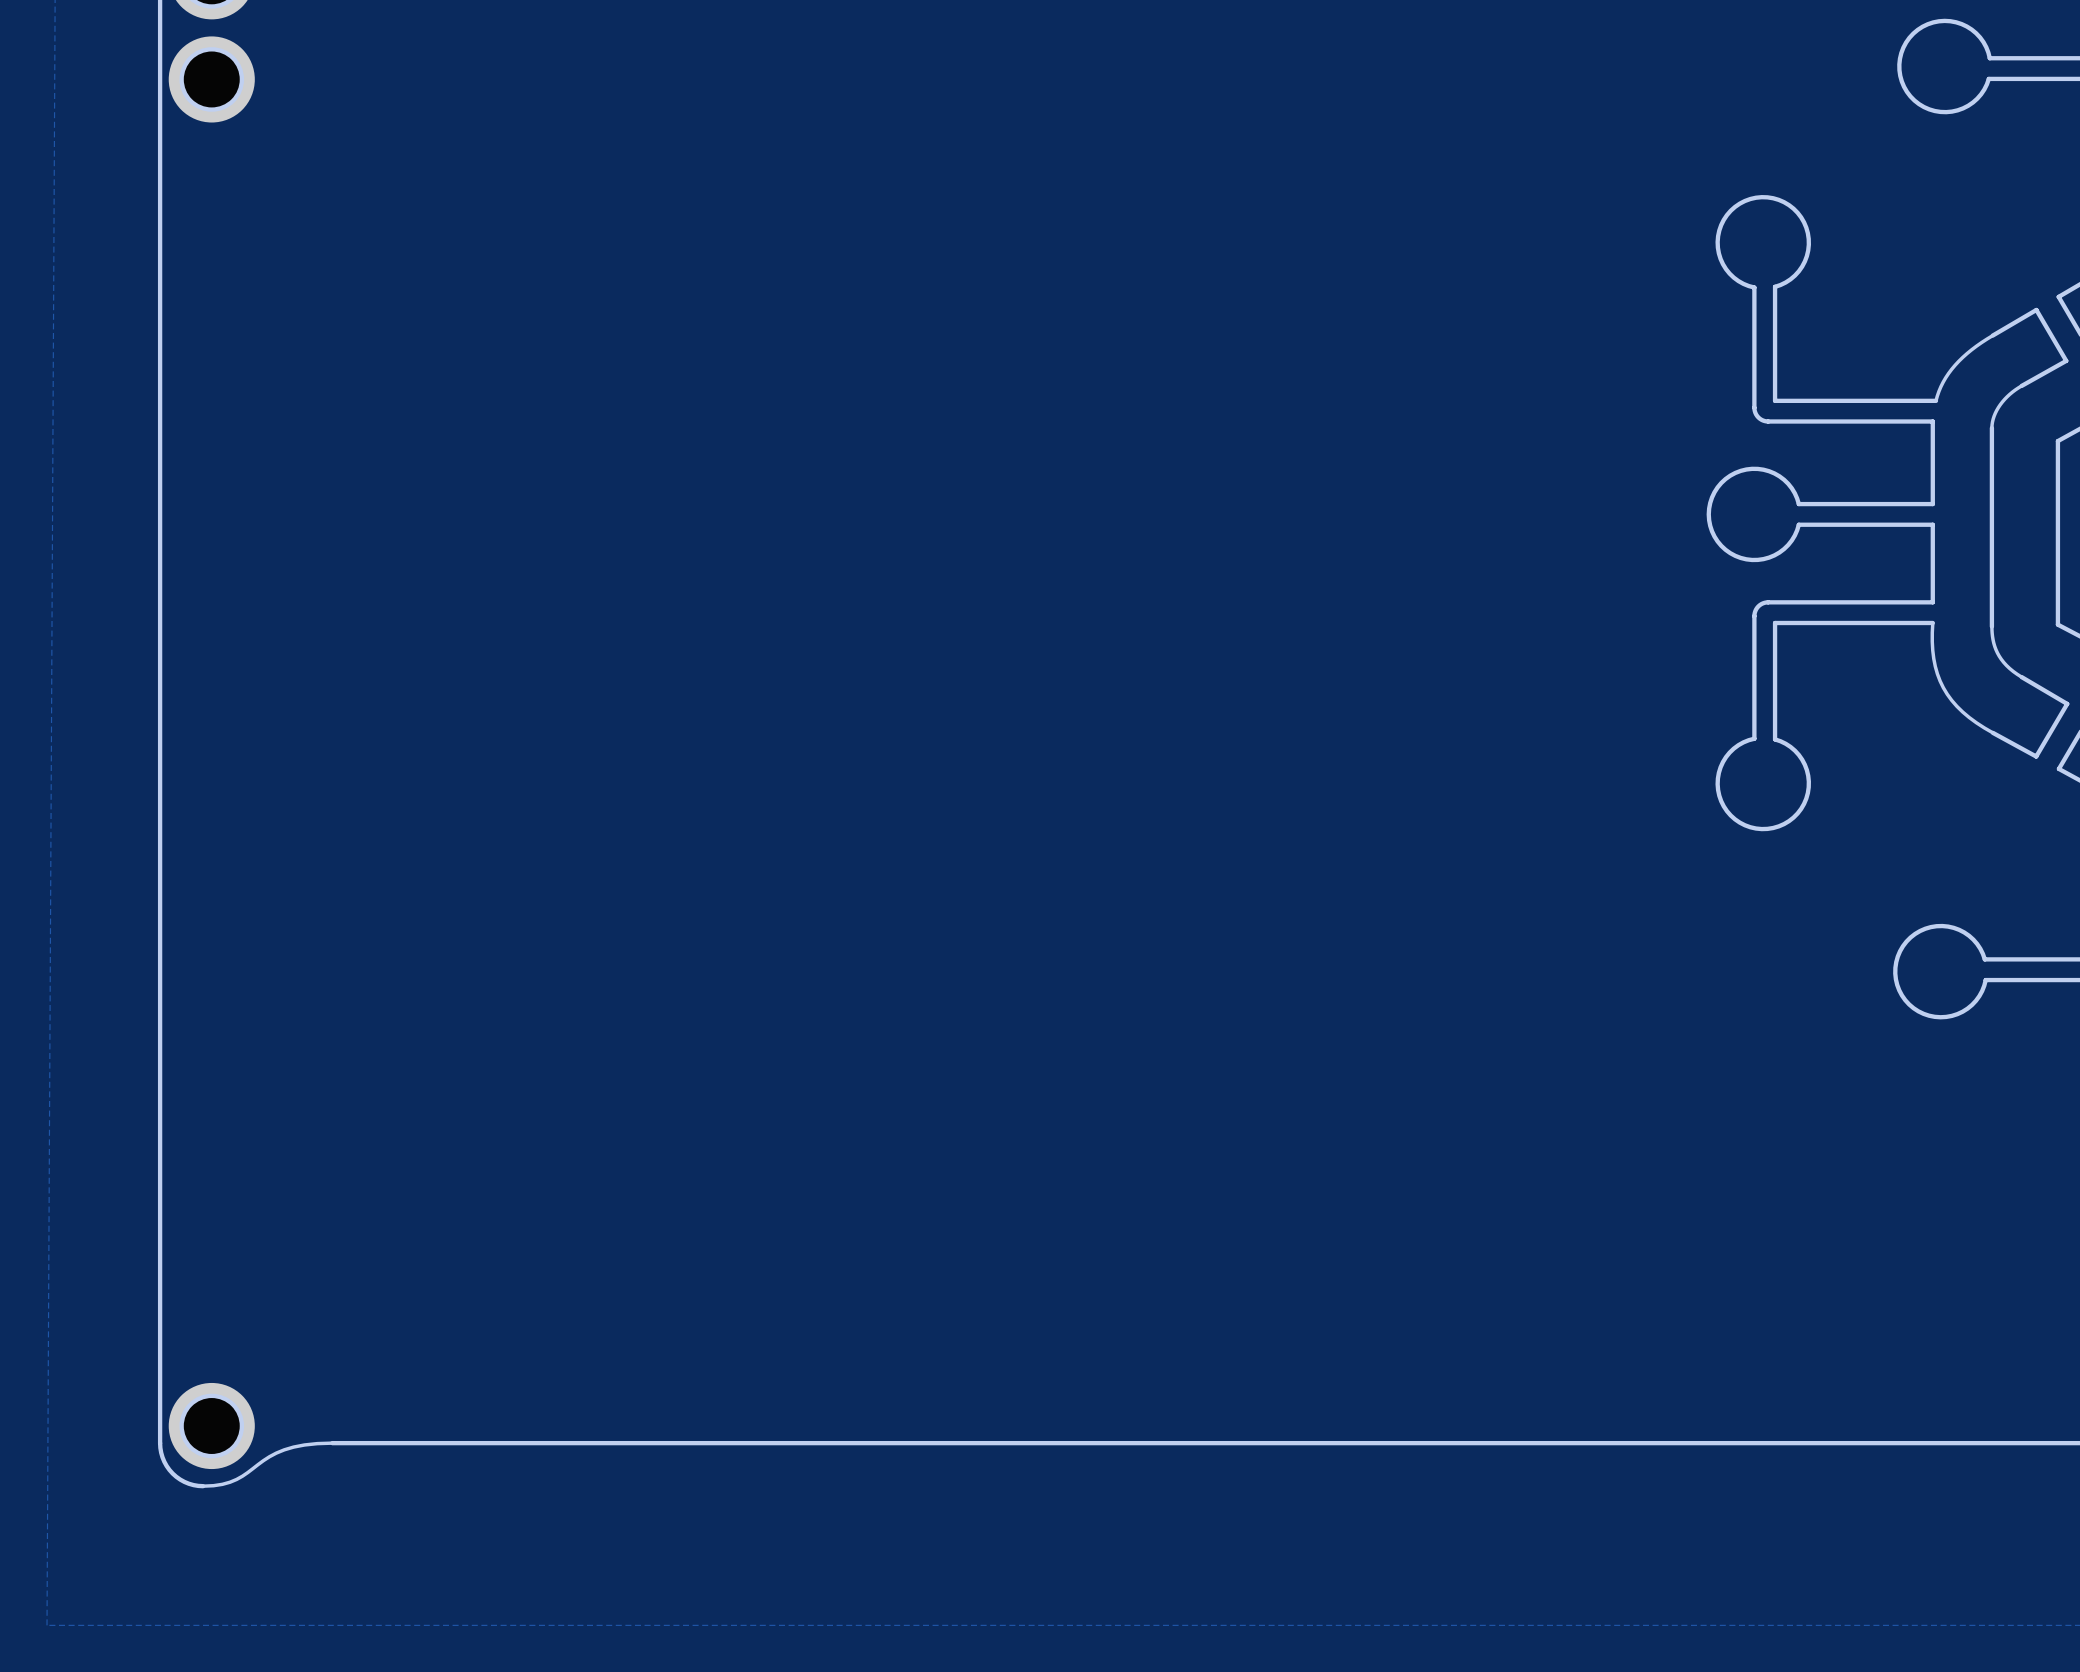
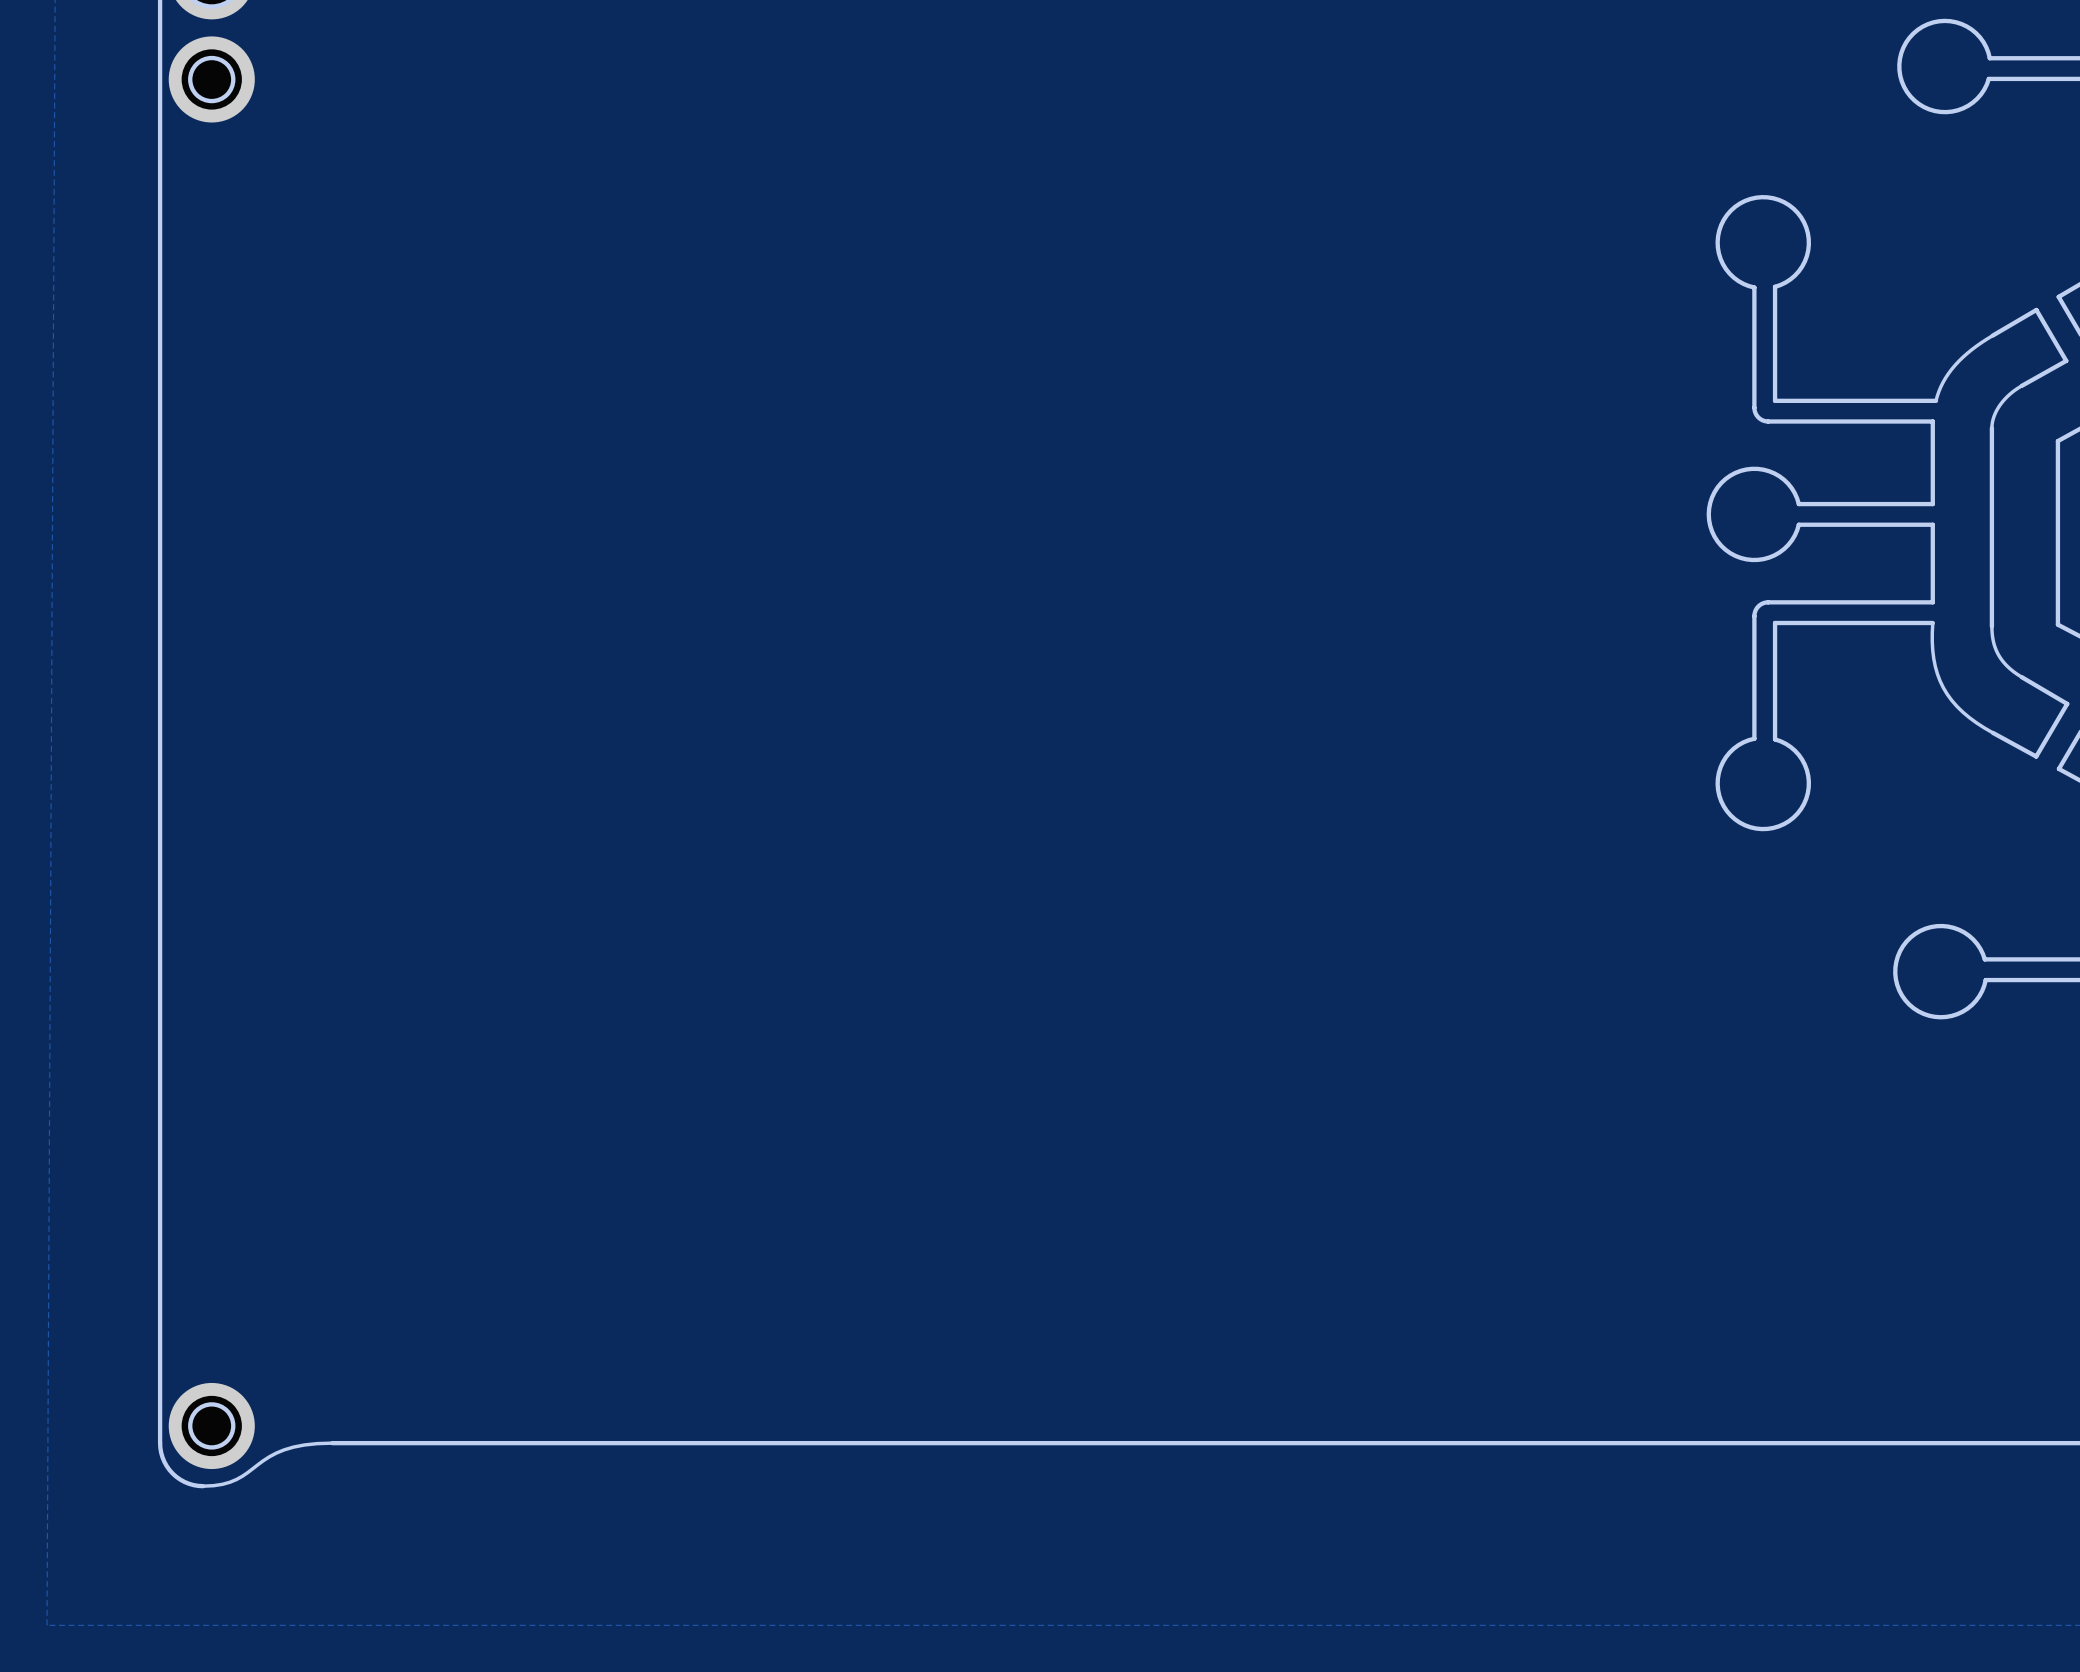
round board edge size: [179, 47, 245, 112] -> [188, 55, 236, 104]
round board edge size: [179, 1393, 245, 1459] -> [188, 1402, 236, 1450]

